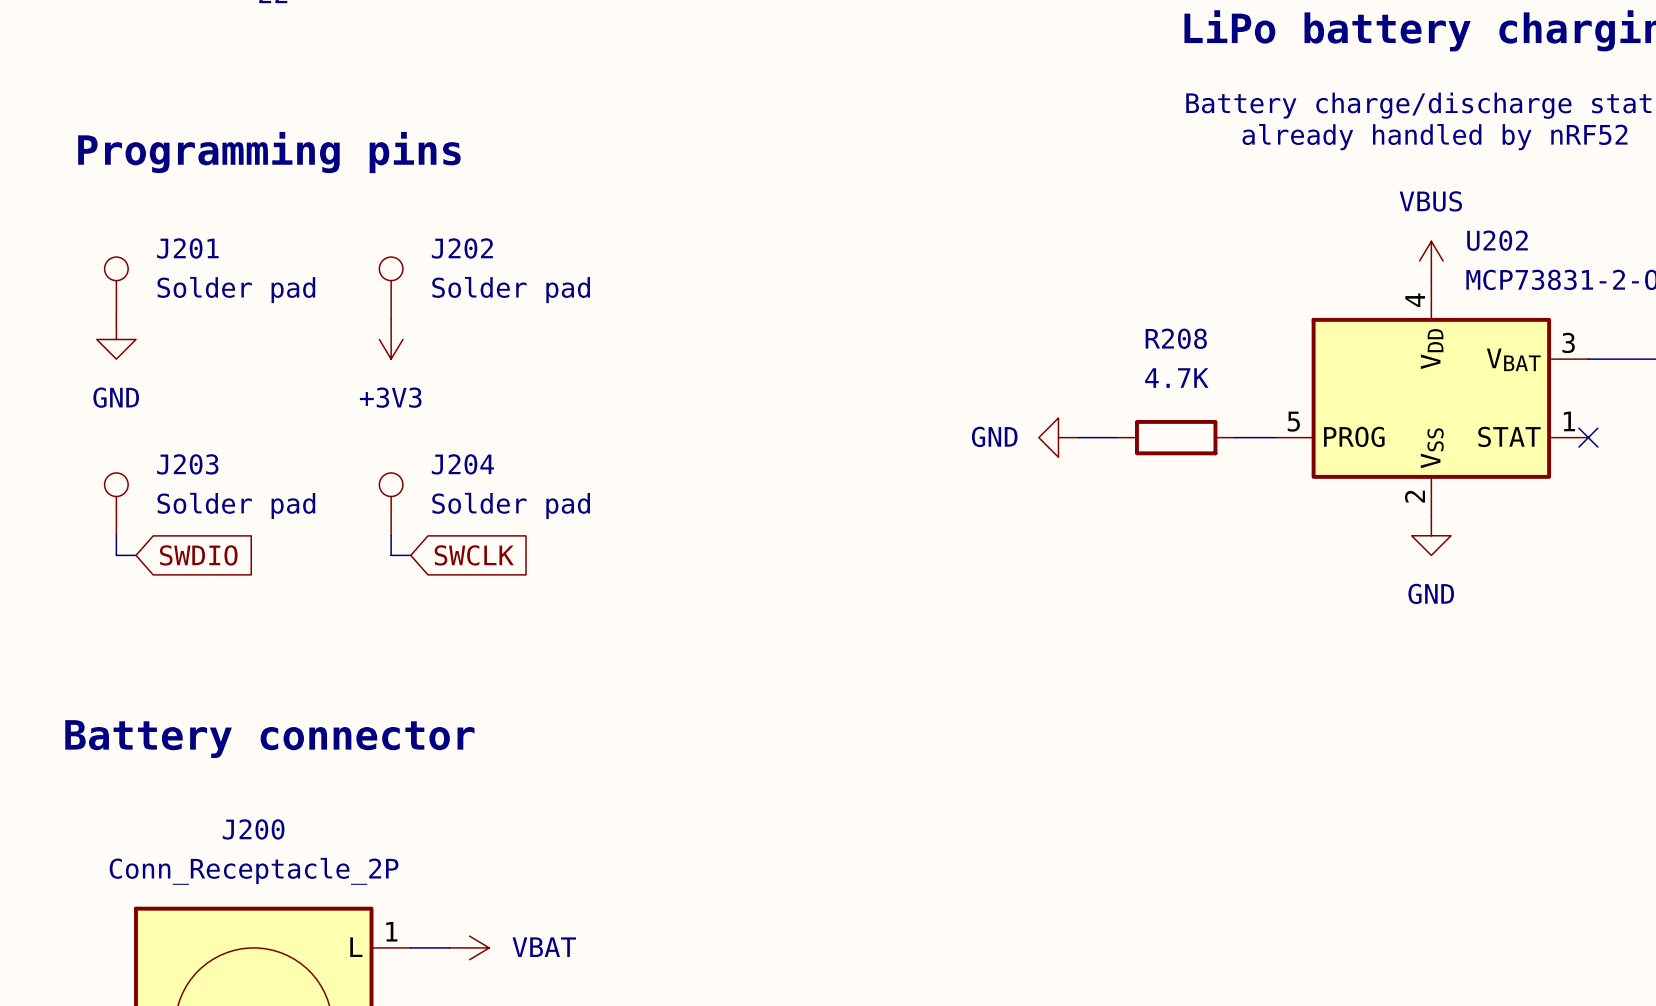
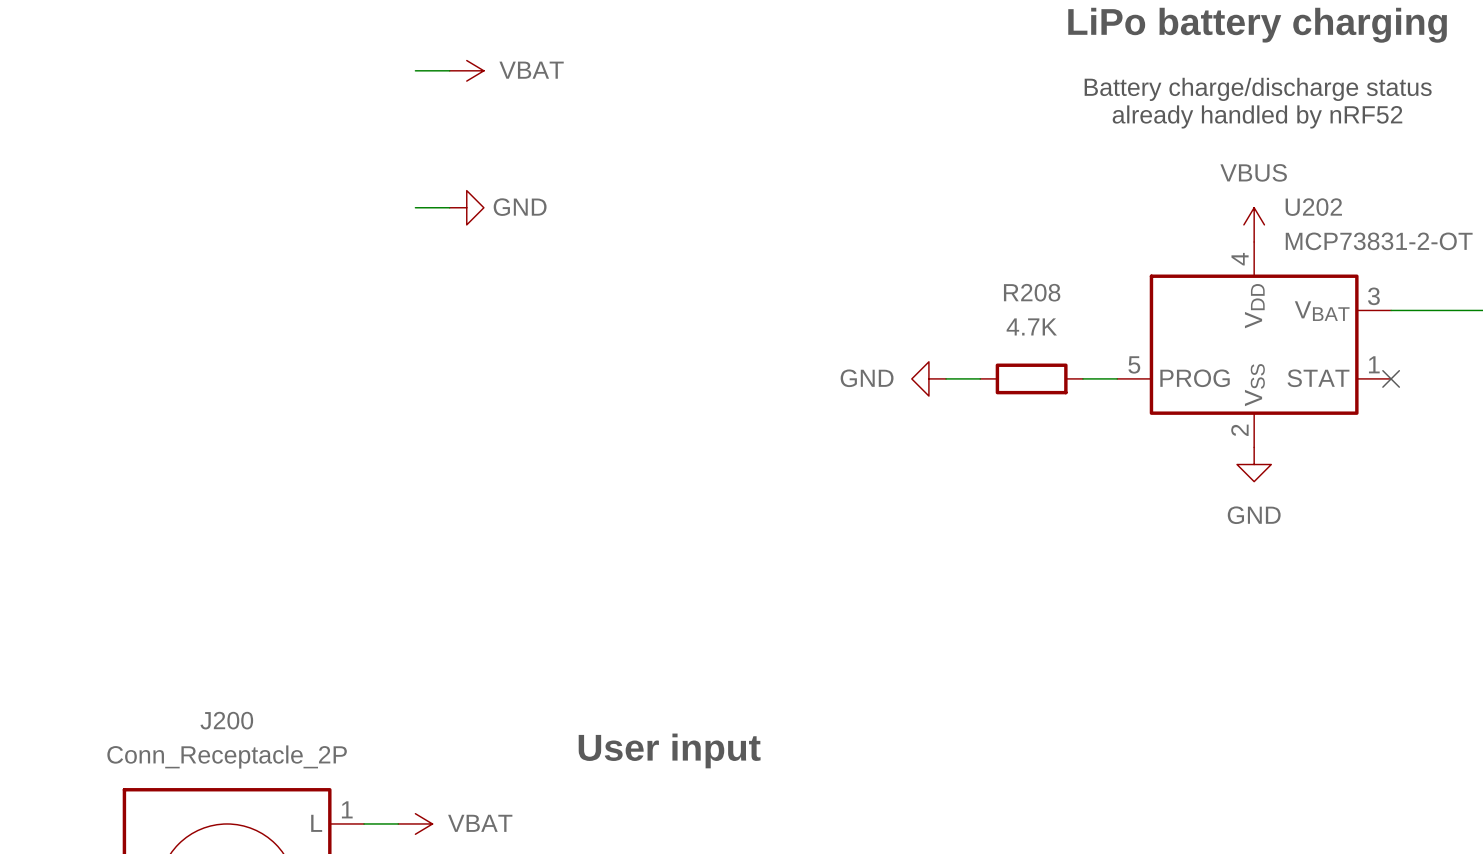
wire: none -> (415, 70) (449, 70)
power symbol: none -> VBAT (466, 70)
text: Programming pins (269, 152) -> none
wire: none -> (415, 207) (449, 207)
power symbol: none -> GND (466, 207)
J201: Solder pad (116, 288) -> none
J202: Solder pad (391, 288) -> none
power symbol: GND (116, 339) -> none
power symbol: +3V3 (391, 339) -> none
J203: Solder pad (116, 504) -> none
J204: Solder pad (391, 504) -> none
wire: (116, 535) (116, 555) (136, 555) -> none
wire: (391, 535) (391, 555) (410, 555) -> none
global label: SWDIO (198, 555) -> none
global label: SWCLK (474, 555) -> none
text: Battery connector (269, 739) -> none
text: none -> User input (669, 750)

